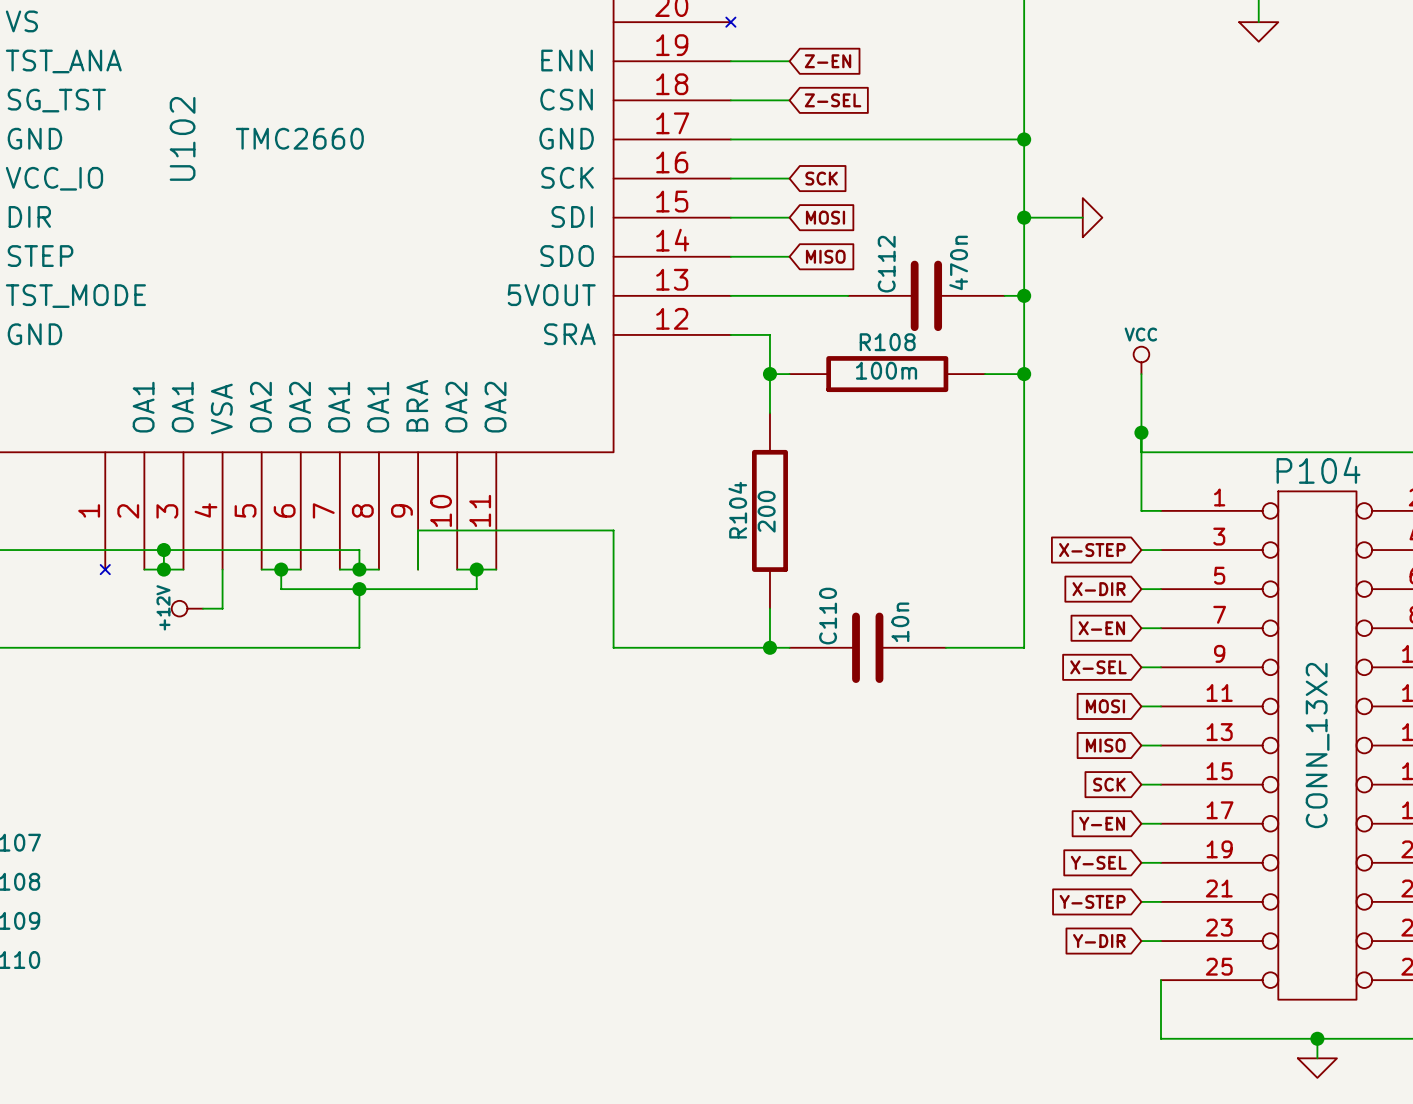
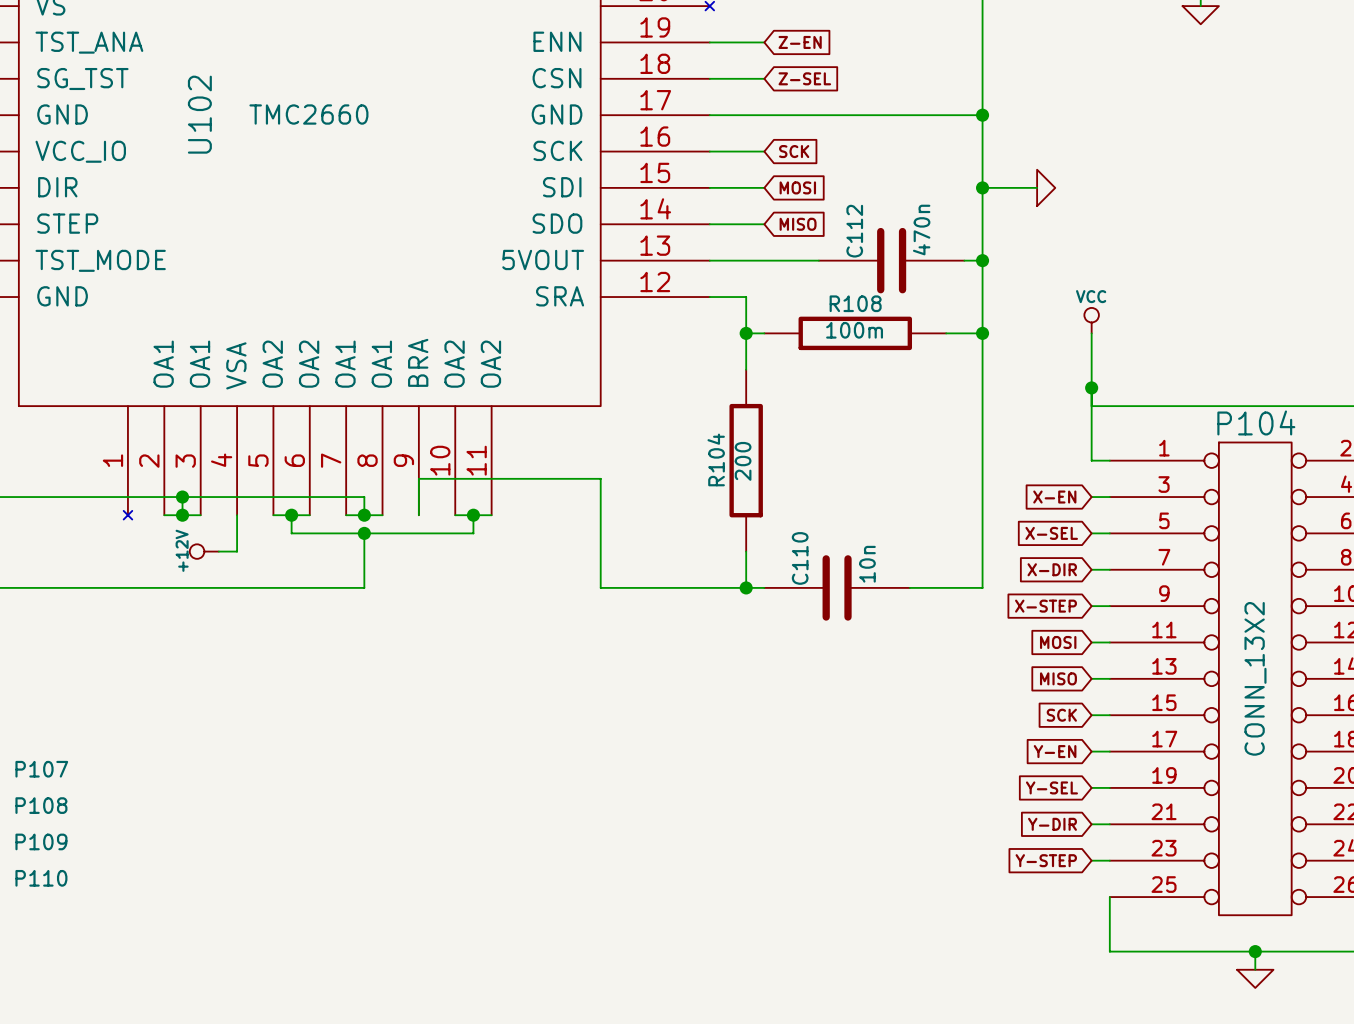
global label: X-STEP (1092, 550) -> X-EN (1054, 497)
global label: X-DIR (1099, 589) -> X-SEL (1051, 533)
global label: X-EN (1101, 628) -> X-DIR (1052, 569)
global label: X-SEL (1098, 667) -> X-STEP (1045, 606)
global label: Y-STEP (1092, 901) -> Y-DIR (1052, 824)
global label: Y-DIR (1099, 941) -> Y-STEP (1046, 860)

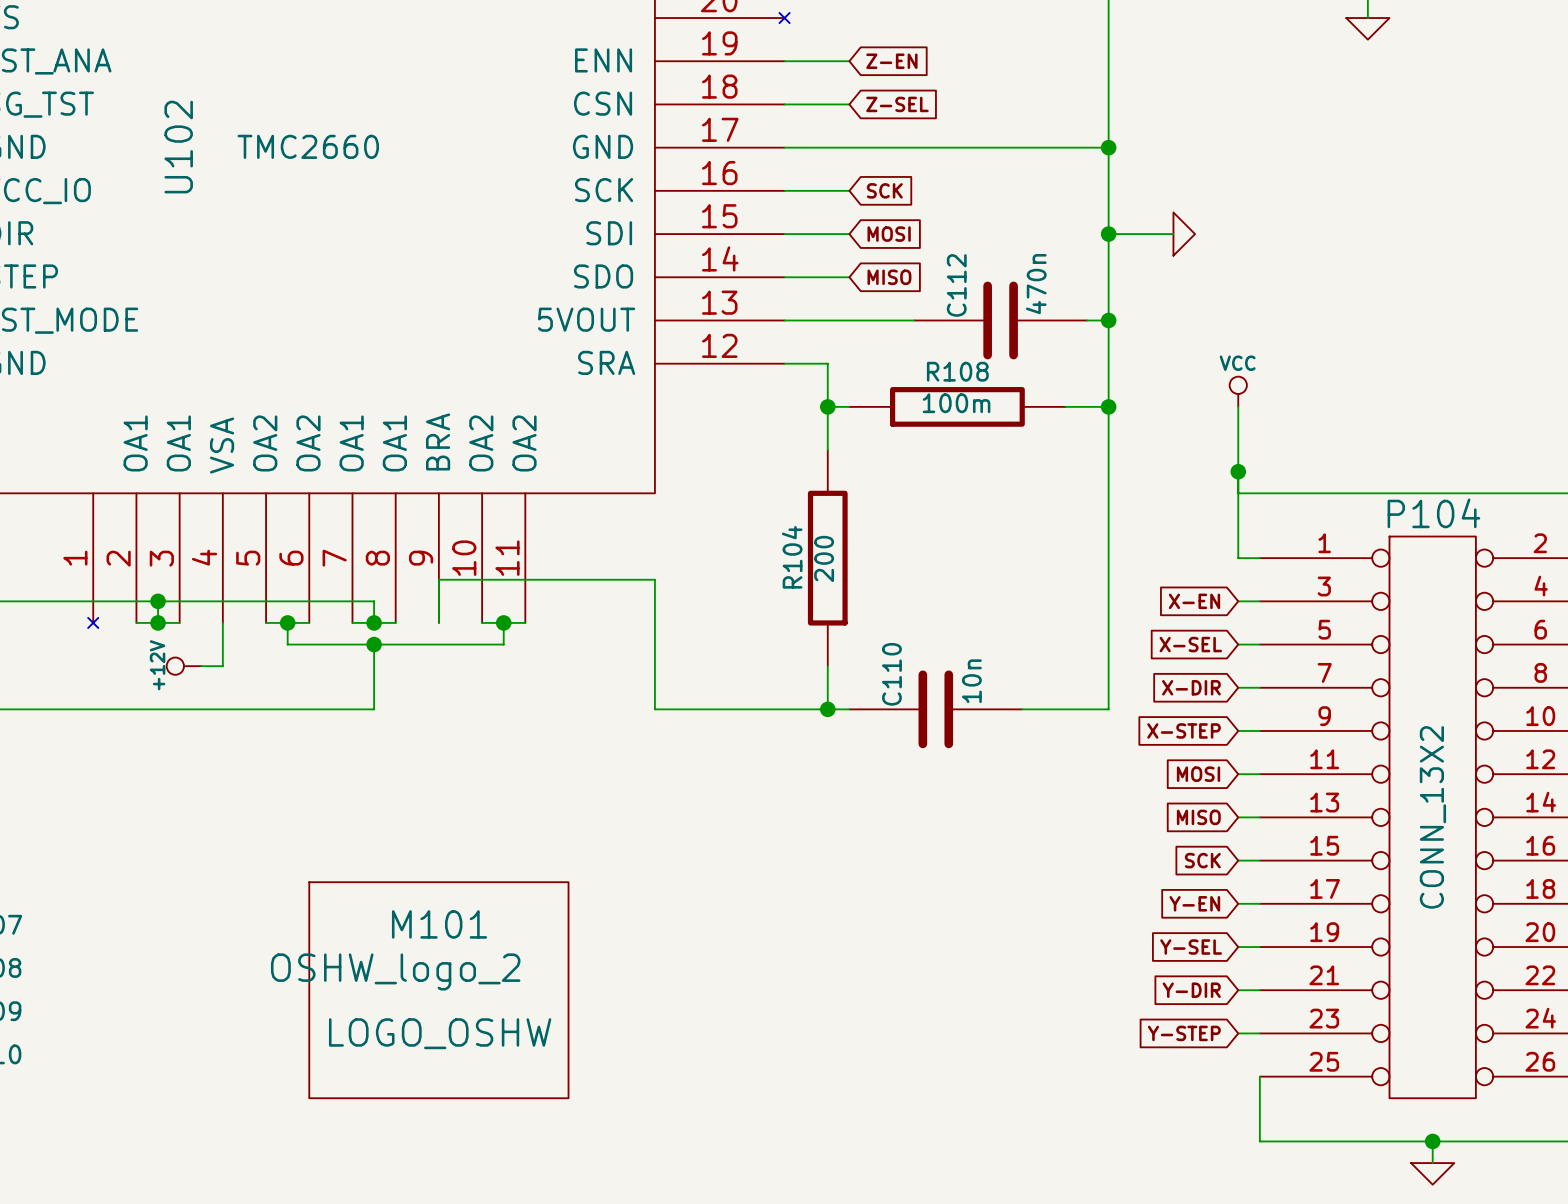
M101: none -> LOGO_OSHW (438, 990)

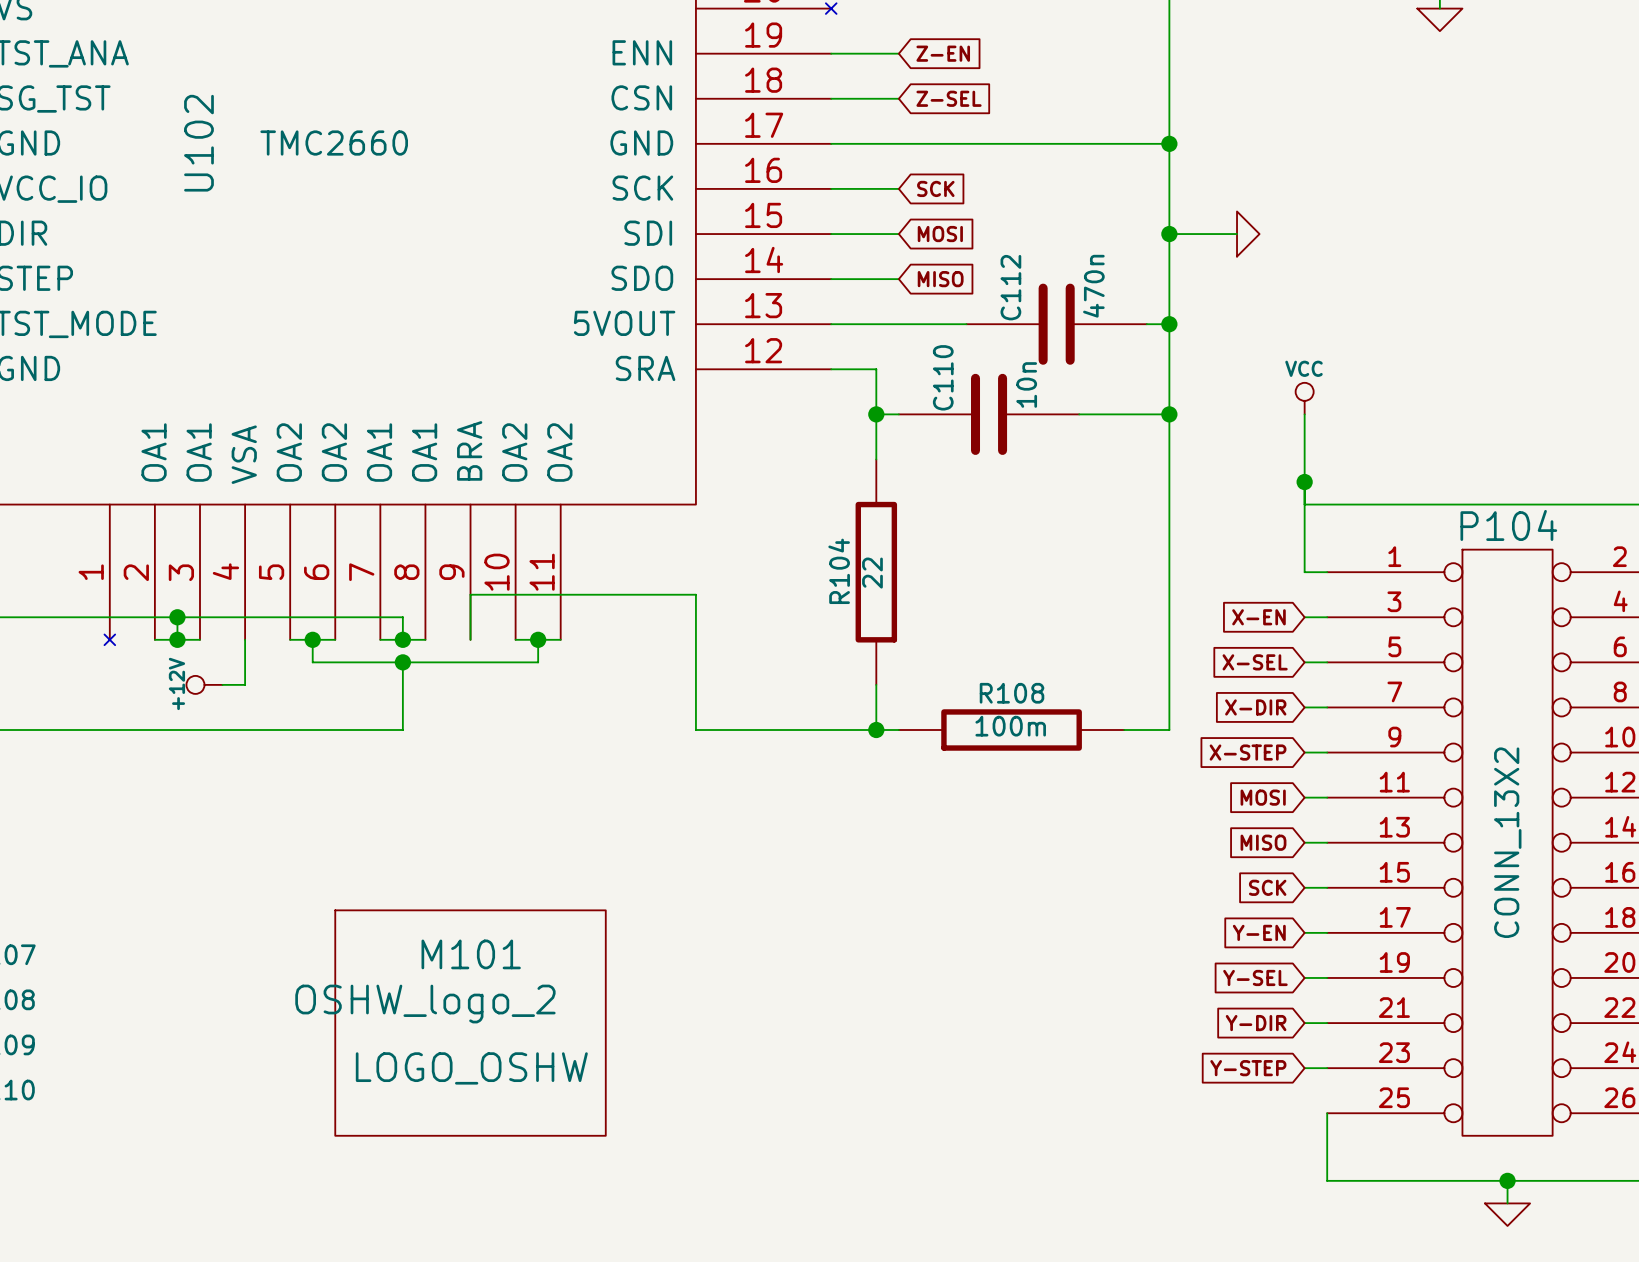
R108 position: (957, 406) -> (1011, 729)
R104 value: 200 (824, 558) -> 22 (872, 573)
C110 position: (935, 709) -> (989, 414)

